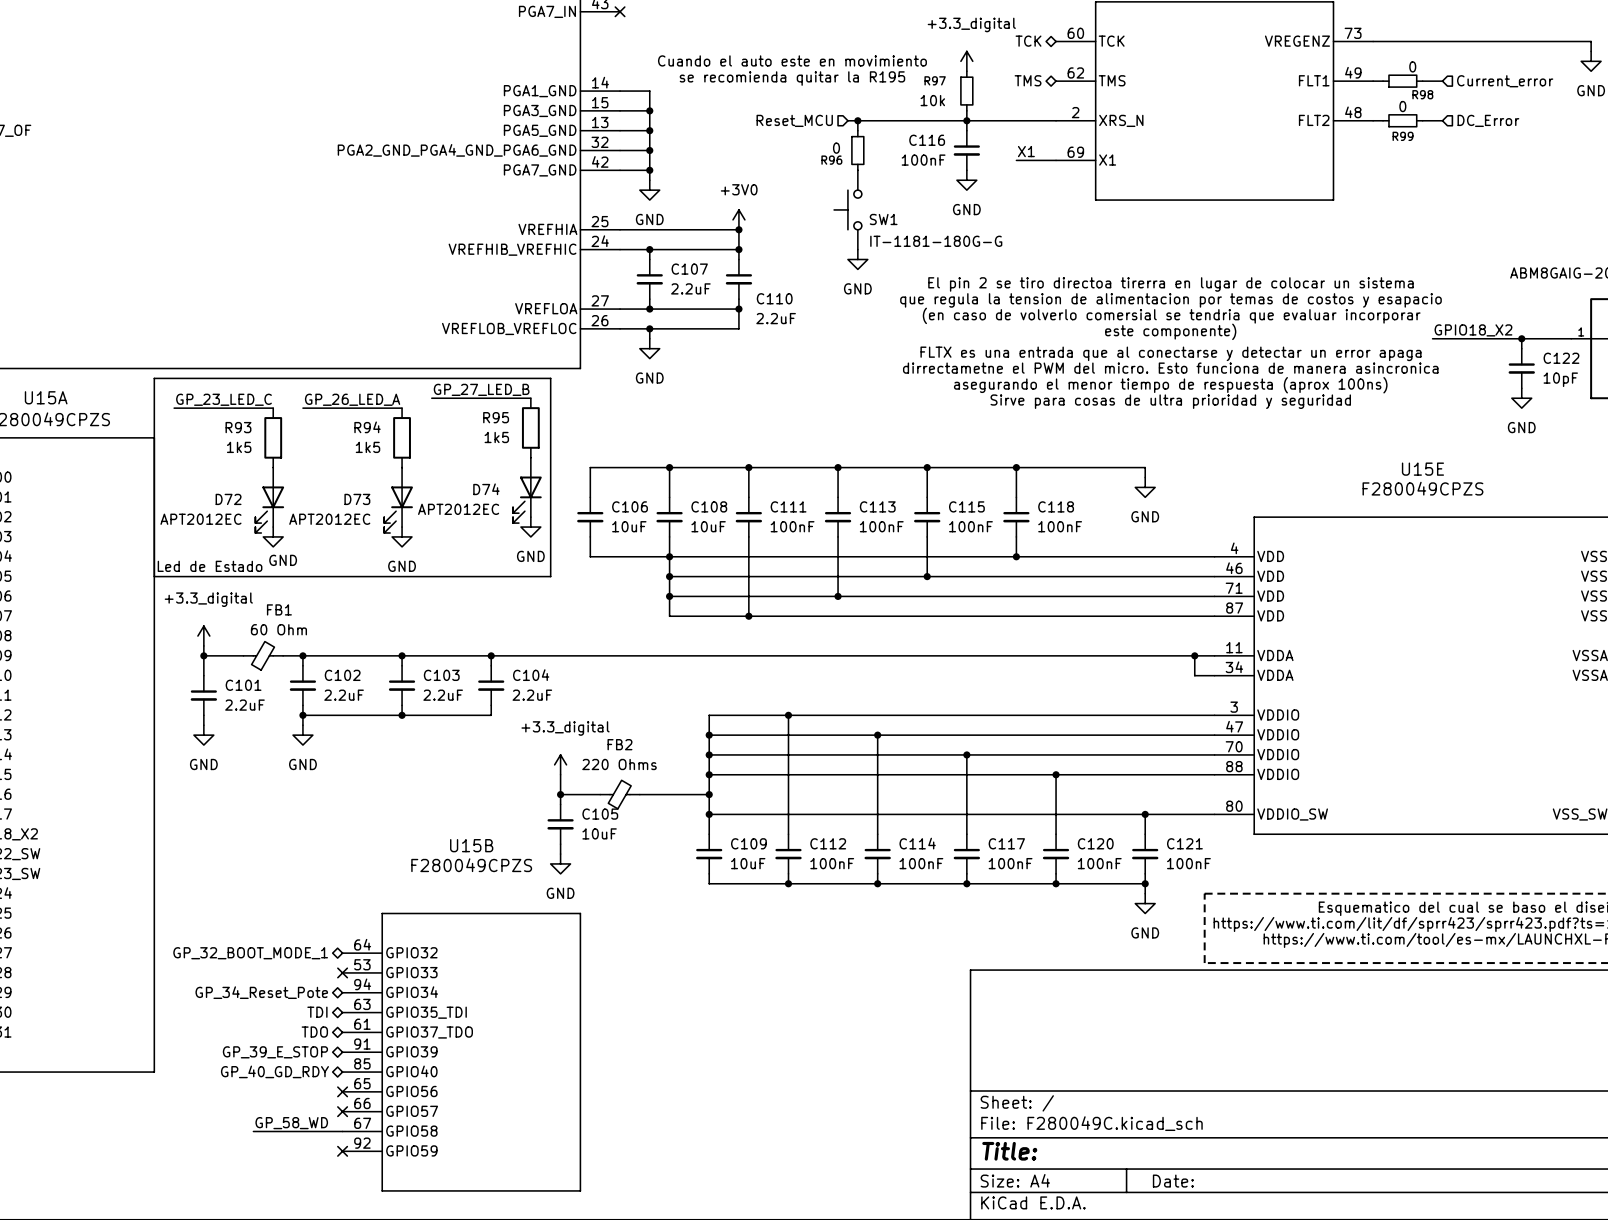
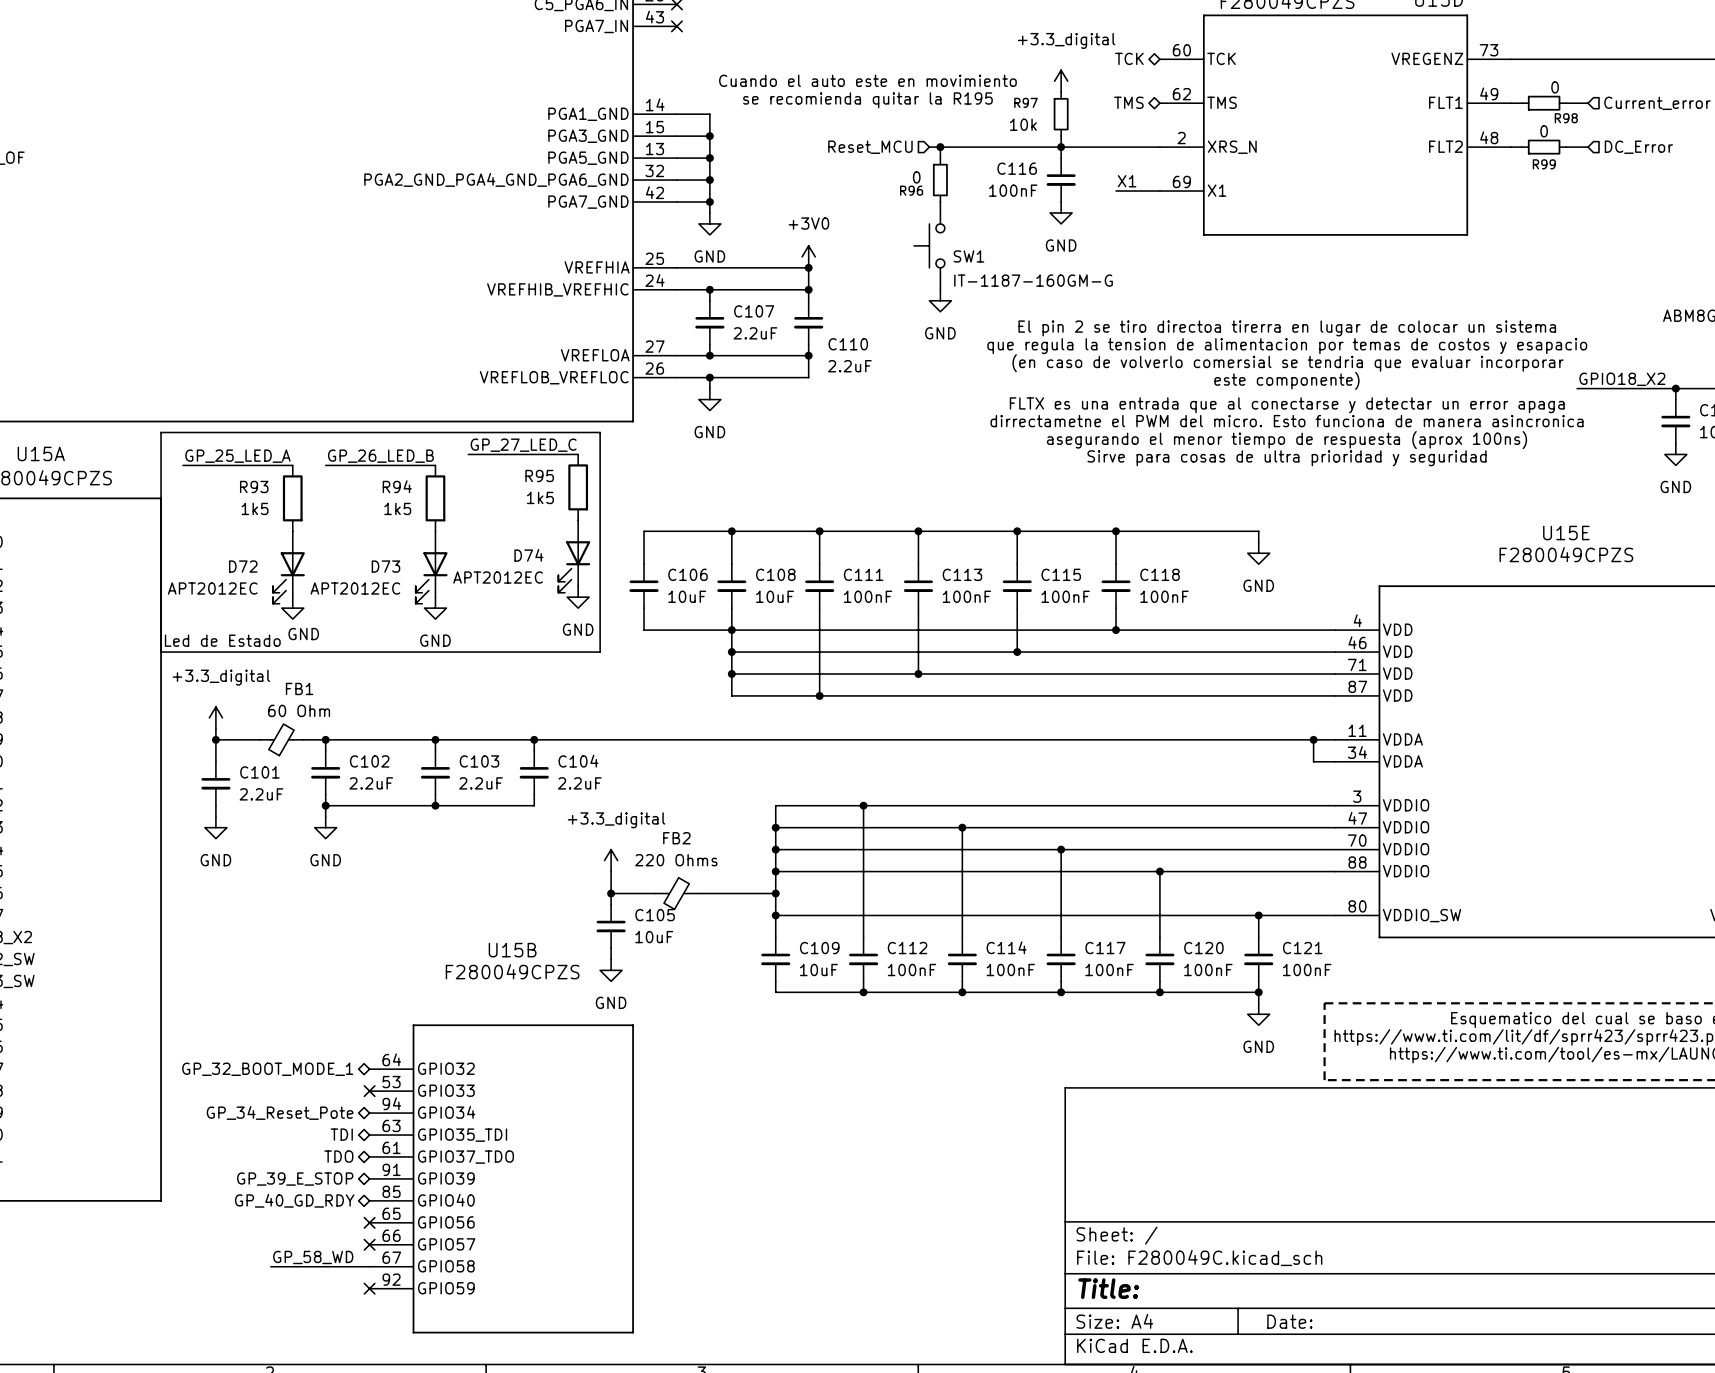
SW1 value: IT-1181-180G-G (936, 241) -> IT-1187-160GM-G (1033, 280)
label: GP_27_LED_B (481, 389) -> GP_27_LED_C (523, 445)
label: GP_23_LED_C (223, 399) -> GP_25_LED_A (237, 456)
label: GP_26_LED_A (352, 399) -> GP_26_LED_B (380, 456)

